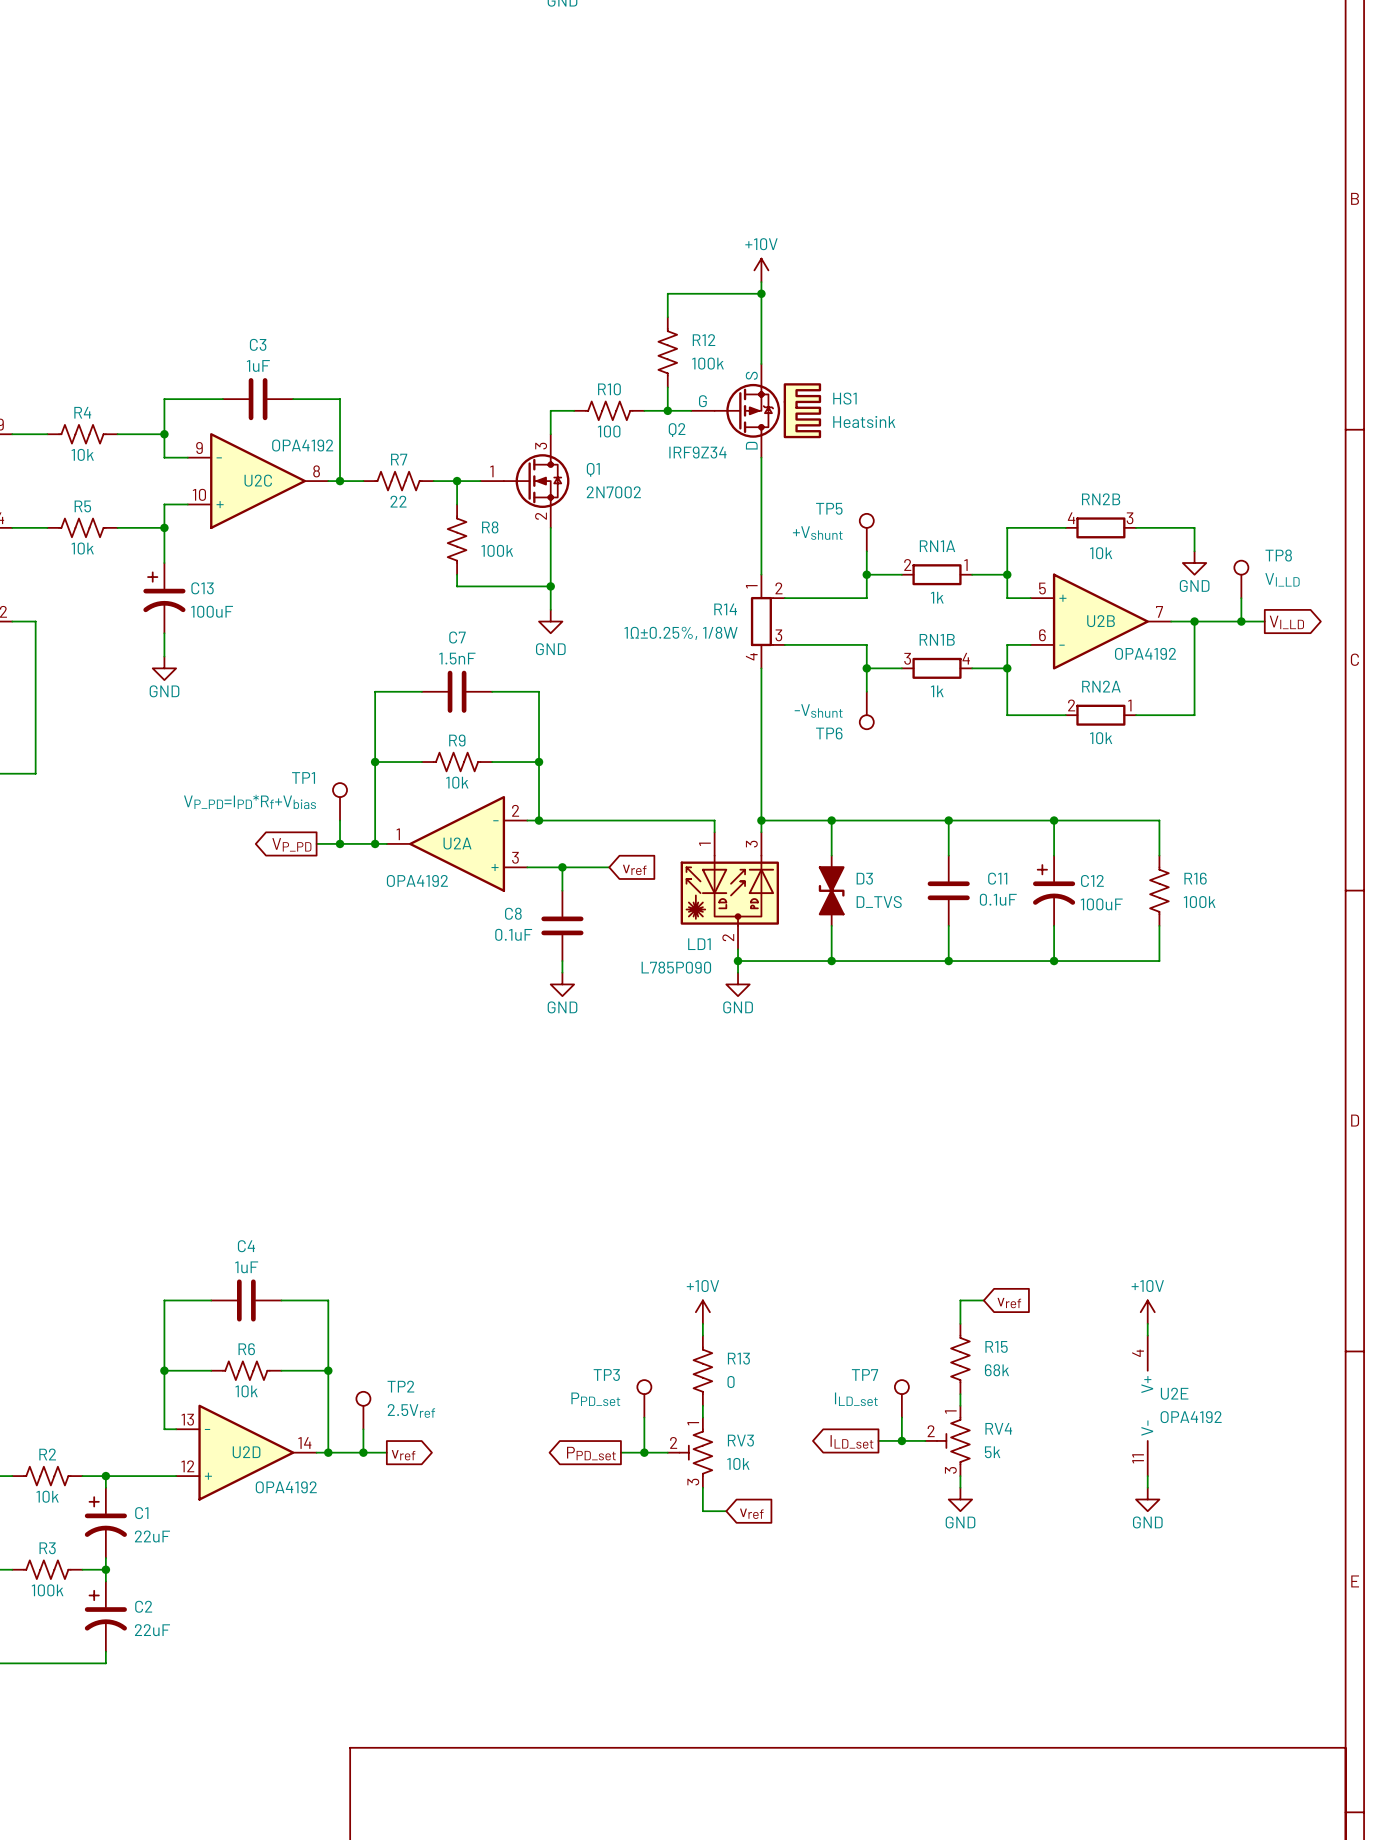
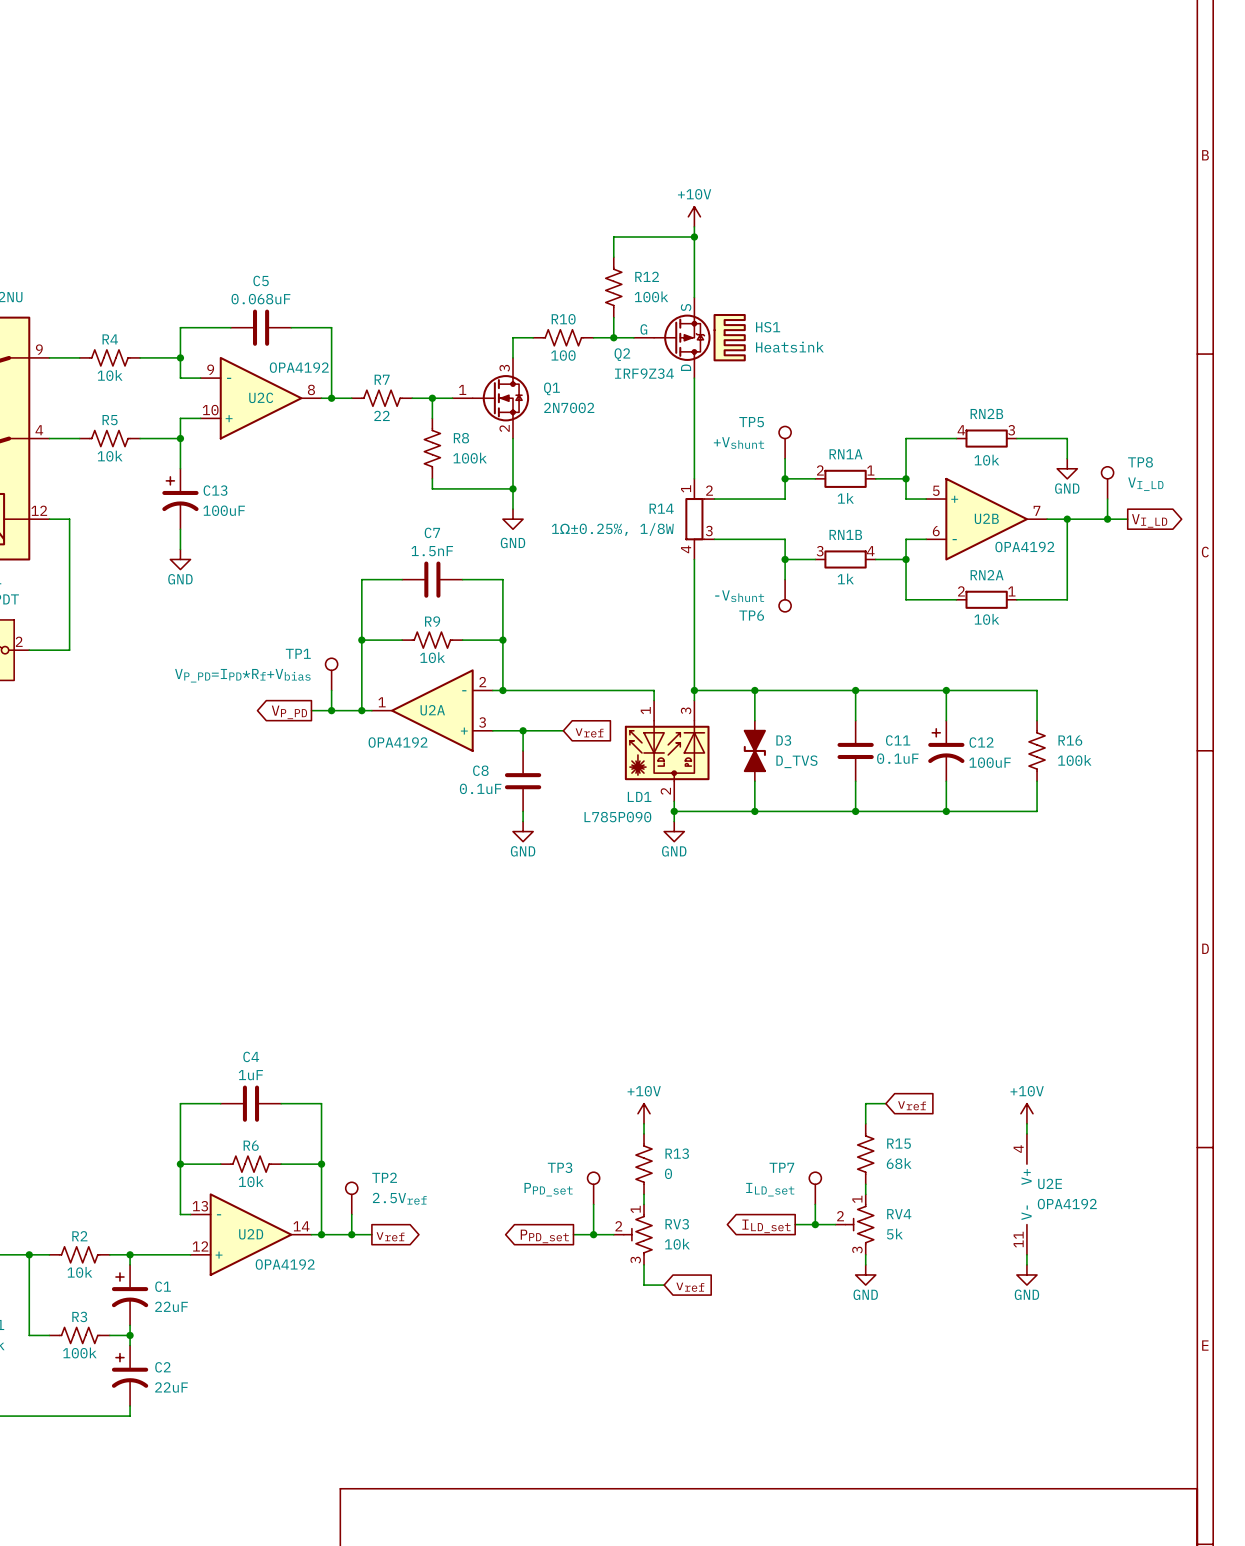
C3 name: C3 (258, 344) -> C5 (261, 280)
C3 value: 1uF (258, 365) -> 0.068uF (260, 299)

